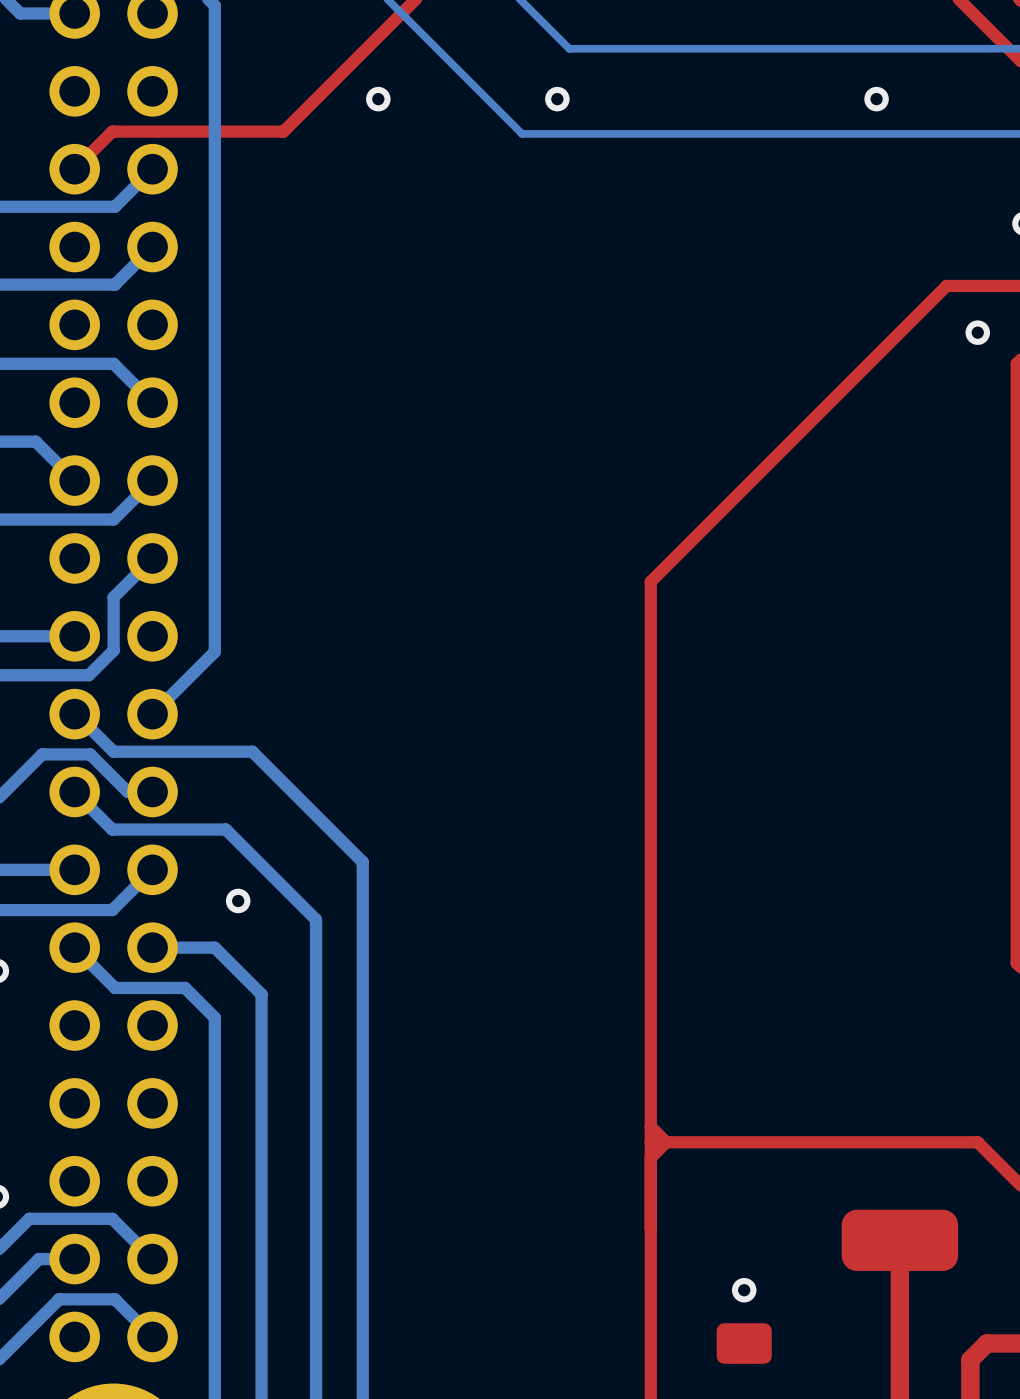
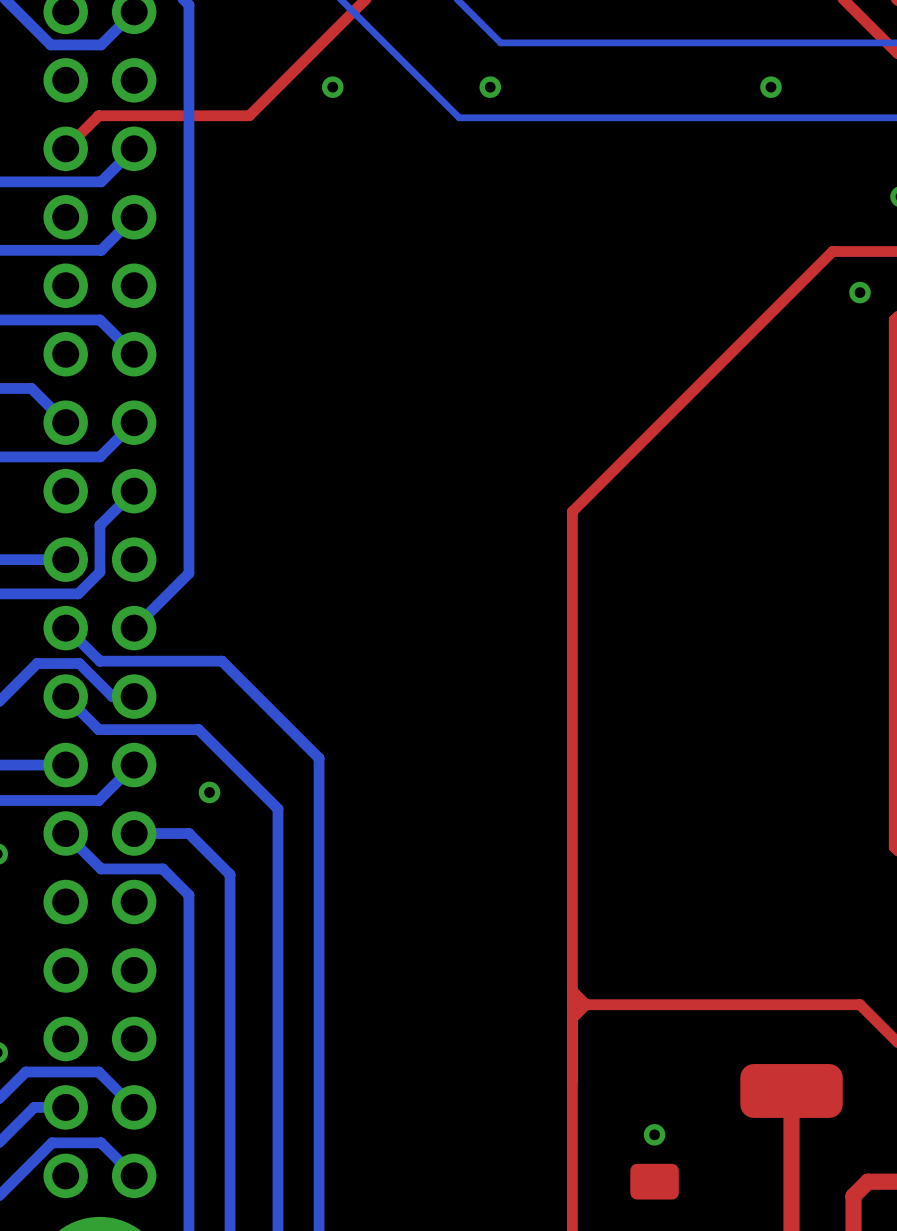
bottom track: (74, 13) (20, 13) -> (134, 11) (101, 44) (50, 44) (17, 11)

